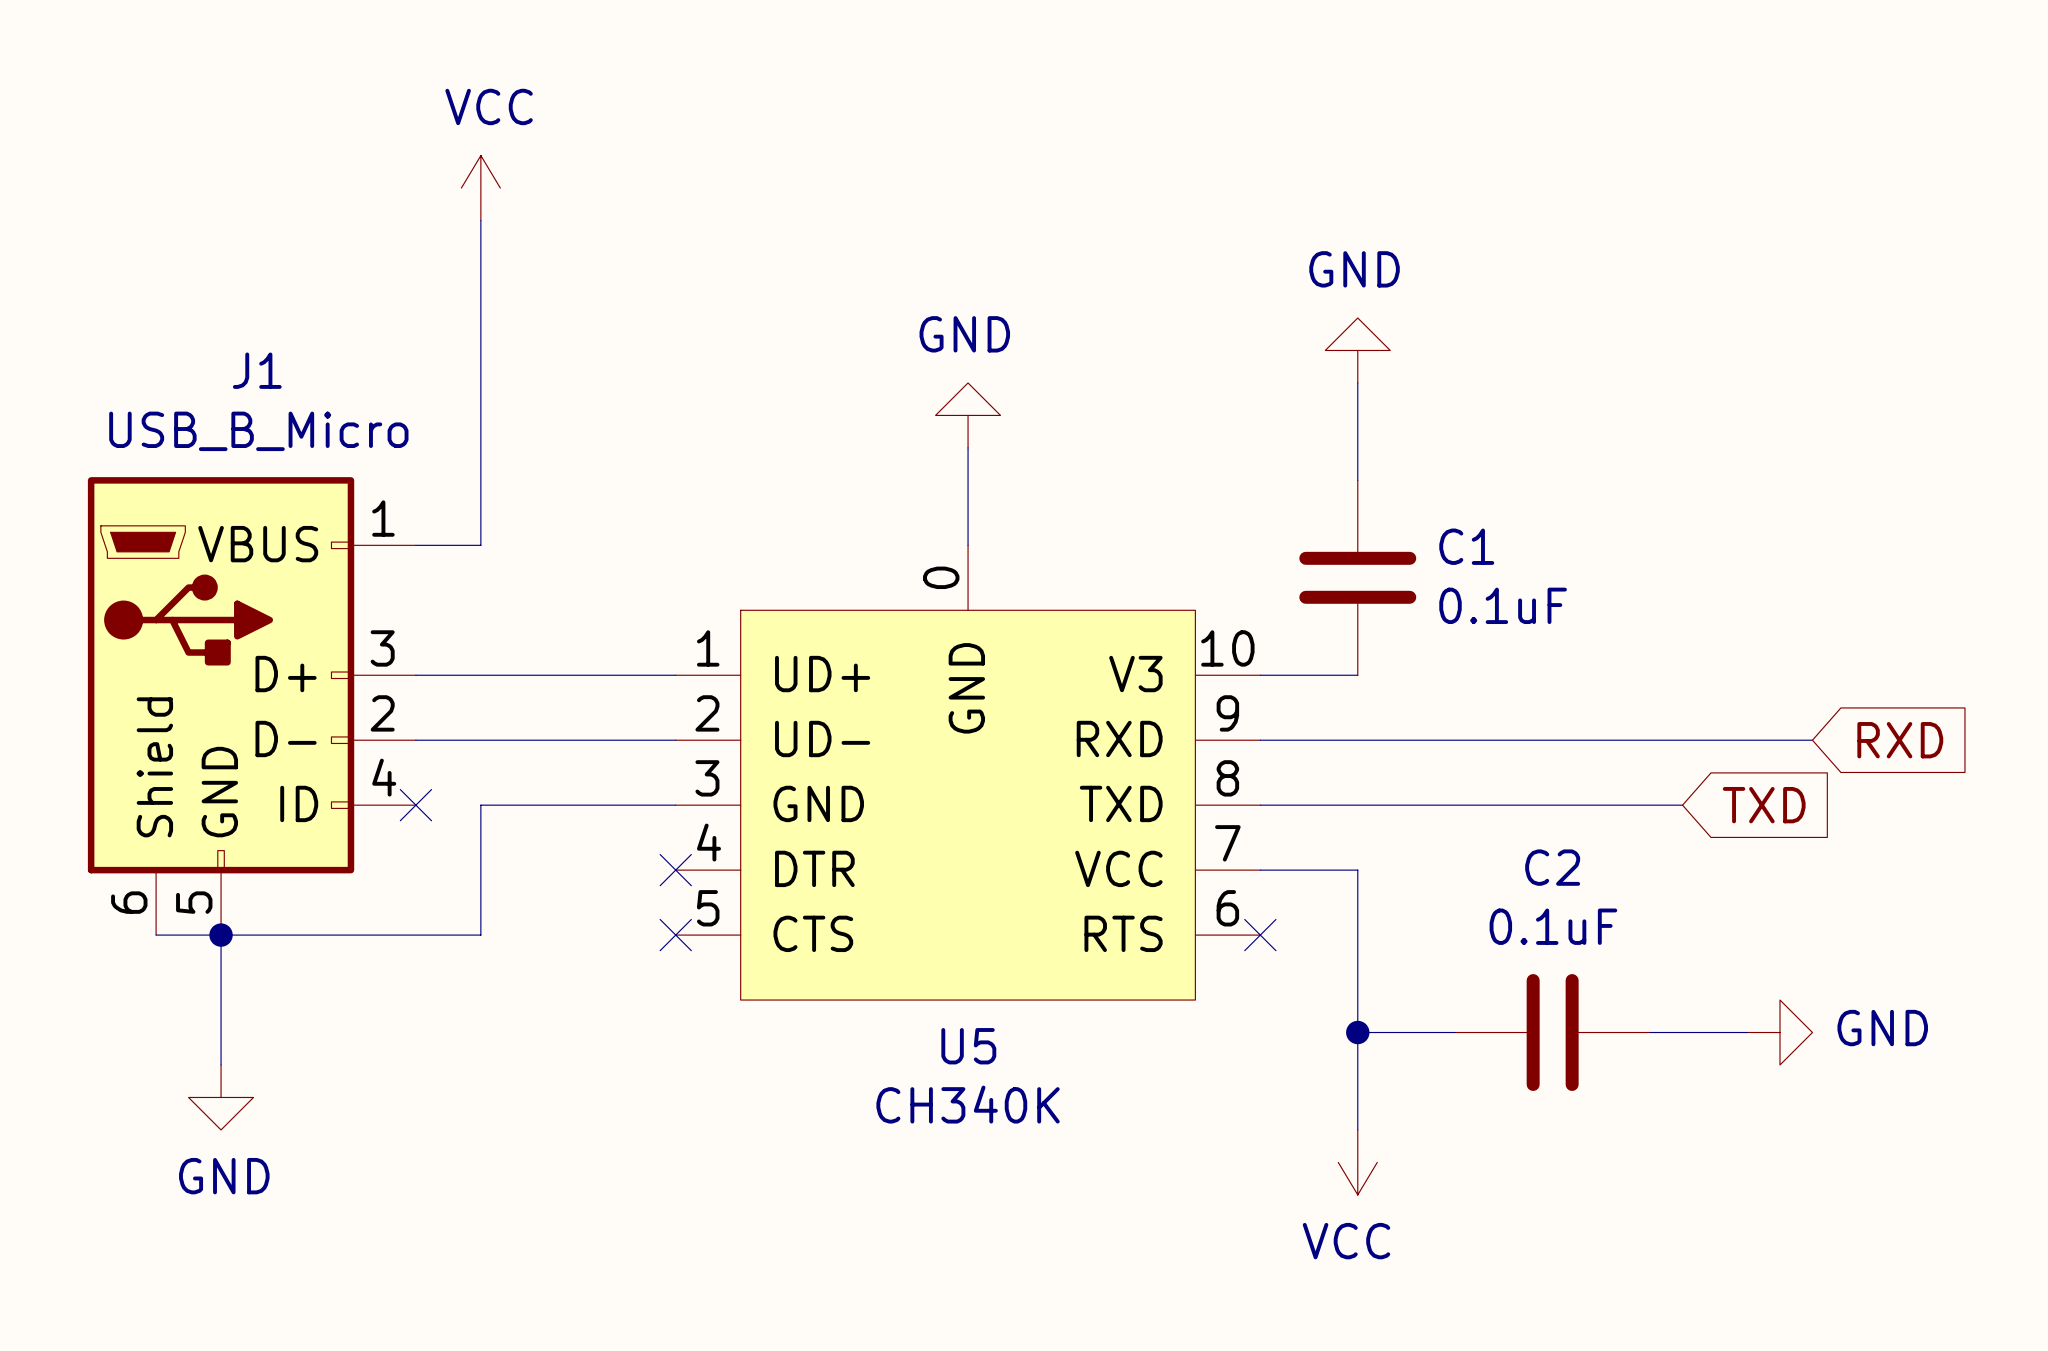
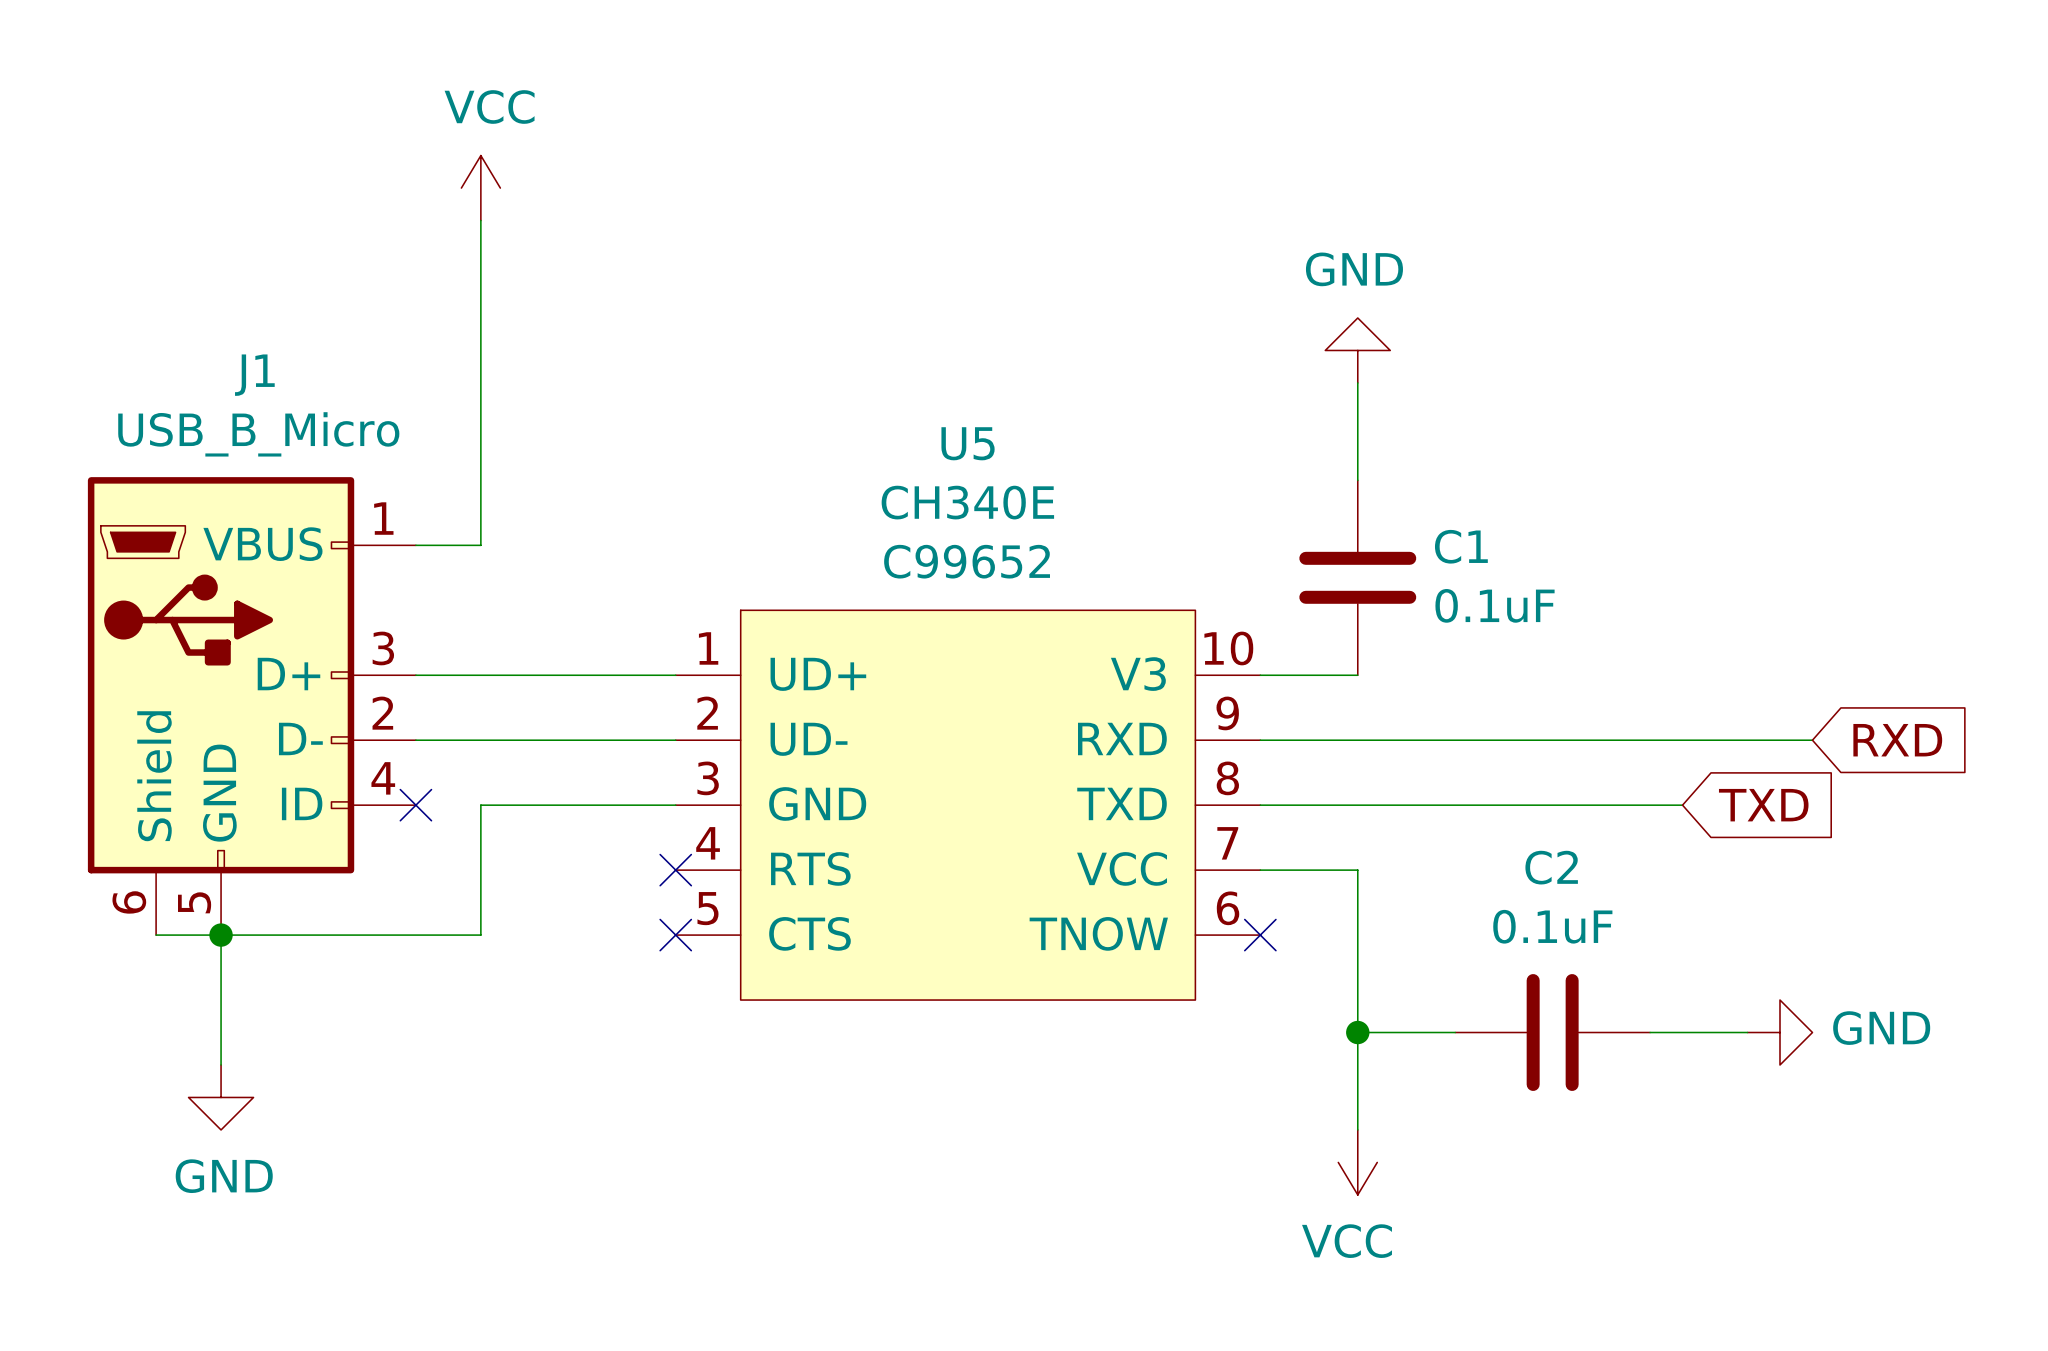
power symbol: GND (968, 415) -> none
wire: (968, 447) (968, 545) -> none
U5 symbol: [675, 545, 1261, 1001] -> [675, 610, 1261, 1001]
U5 text: none -> C99652 (967, 561)
U5 name position: U5 (968, 1046) -> U5 (968, 443)
U5 value: CH340K (968, 1104) -> CH340E (967, 502)

